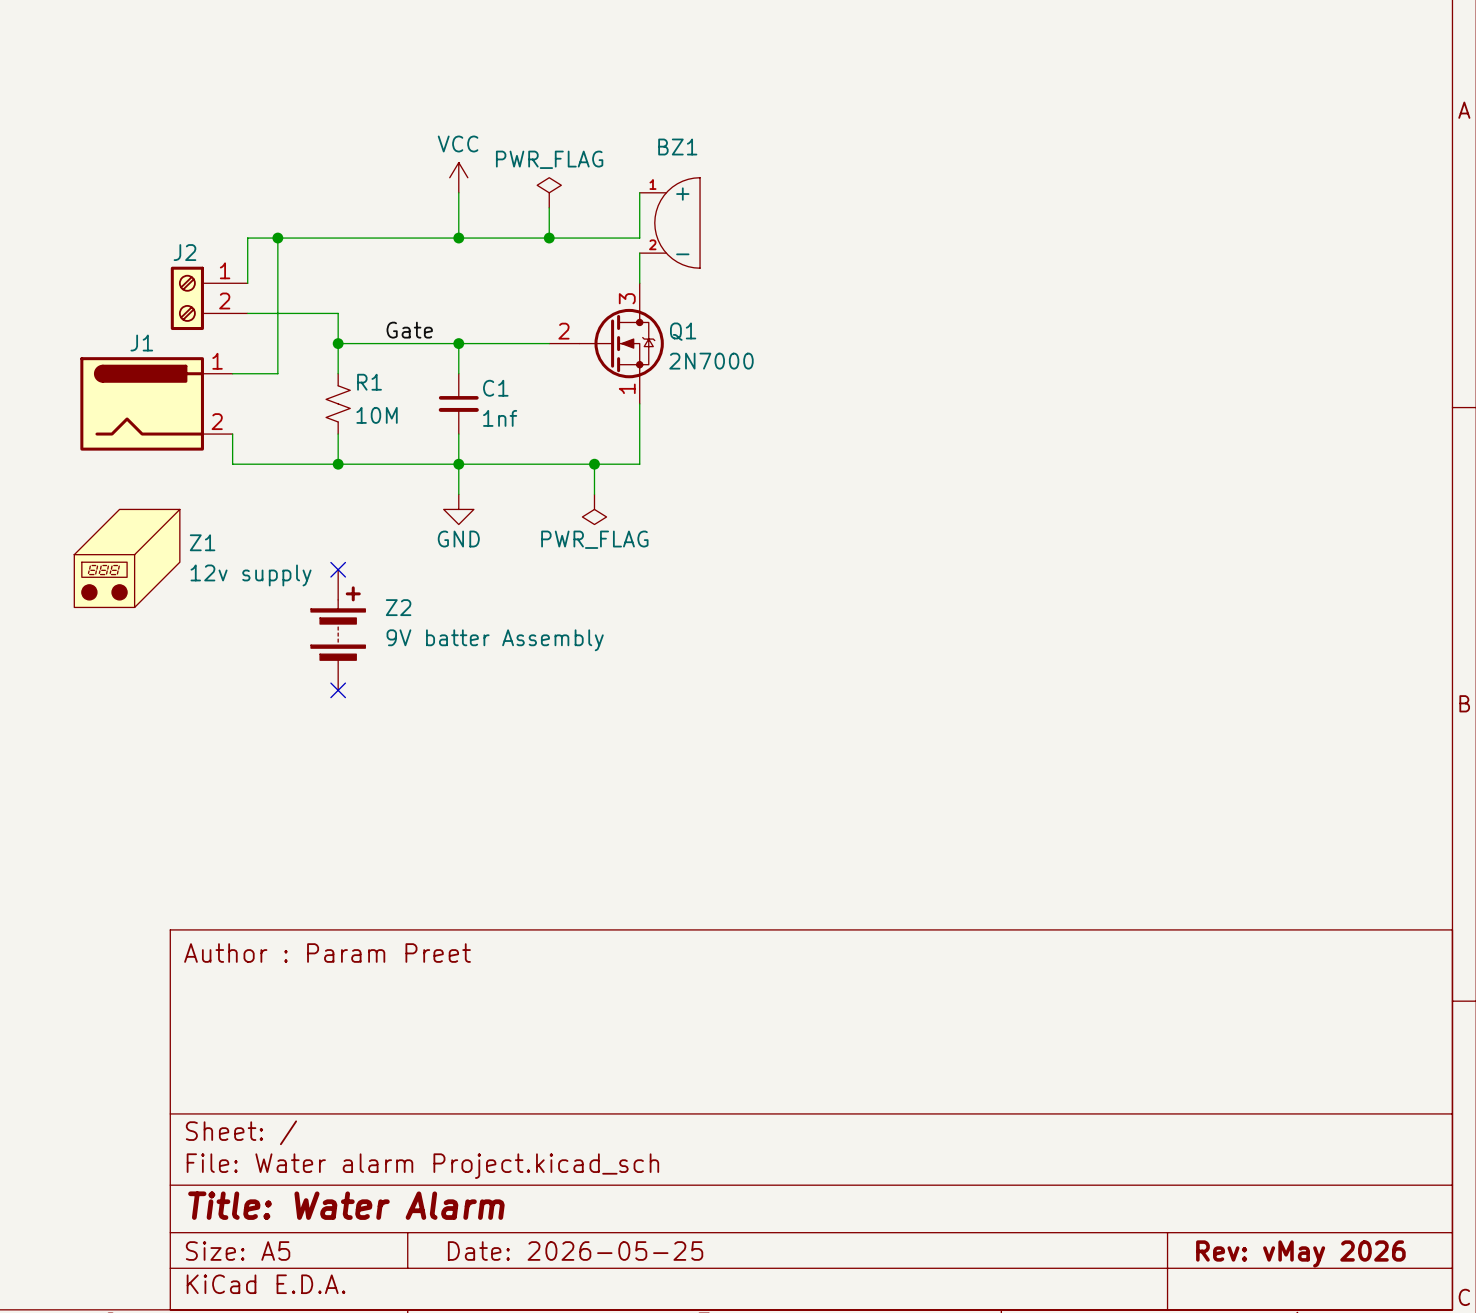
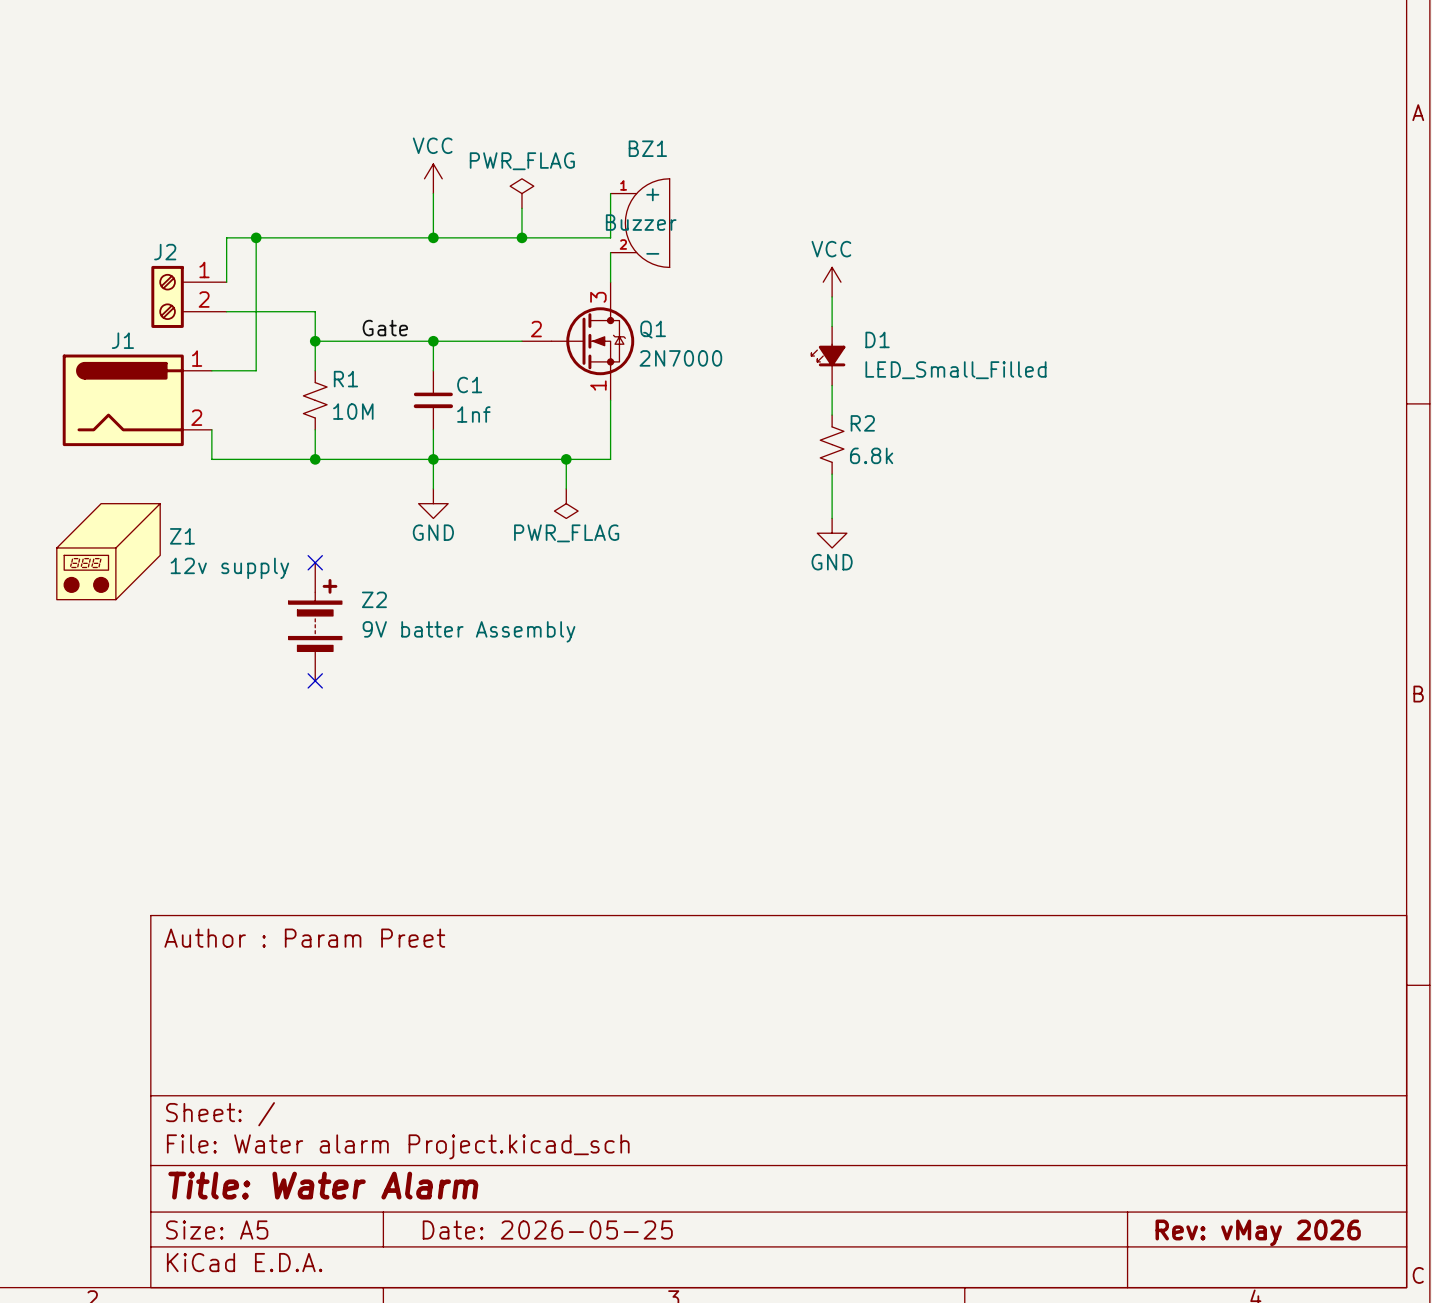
BZ1 value: none -> Buzzer (641, 222)
power symbol: none -> VCC (832, 282)
wire: none -> (832, 296) (832, 326)
D1: none -> LED_Small_Filled (828, 356)
wire: none -> (832, 385) (832, 415)
R2: none -> 6.8k (832, 444)
wire: none -> (832, 474) (832, 518)
power symbol: none -> GND (832, 533)

